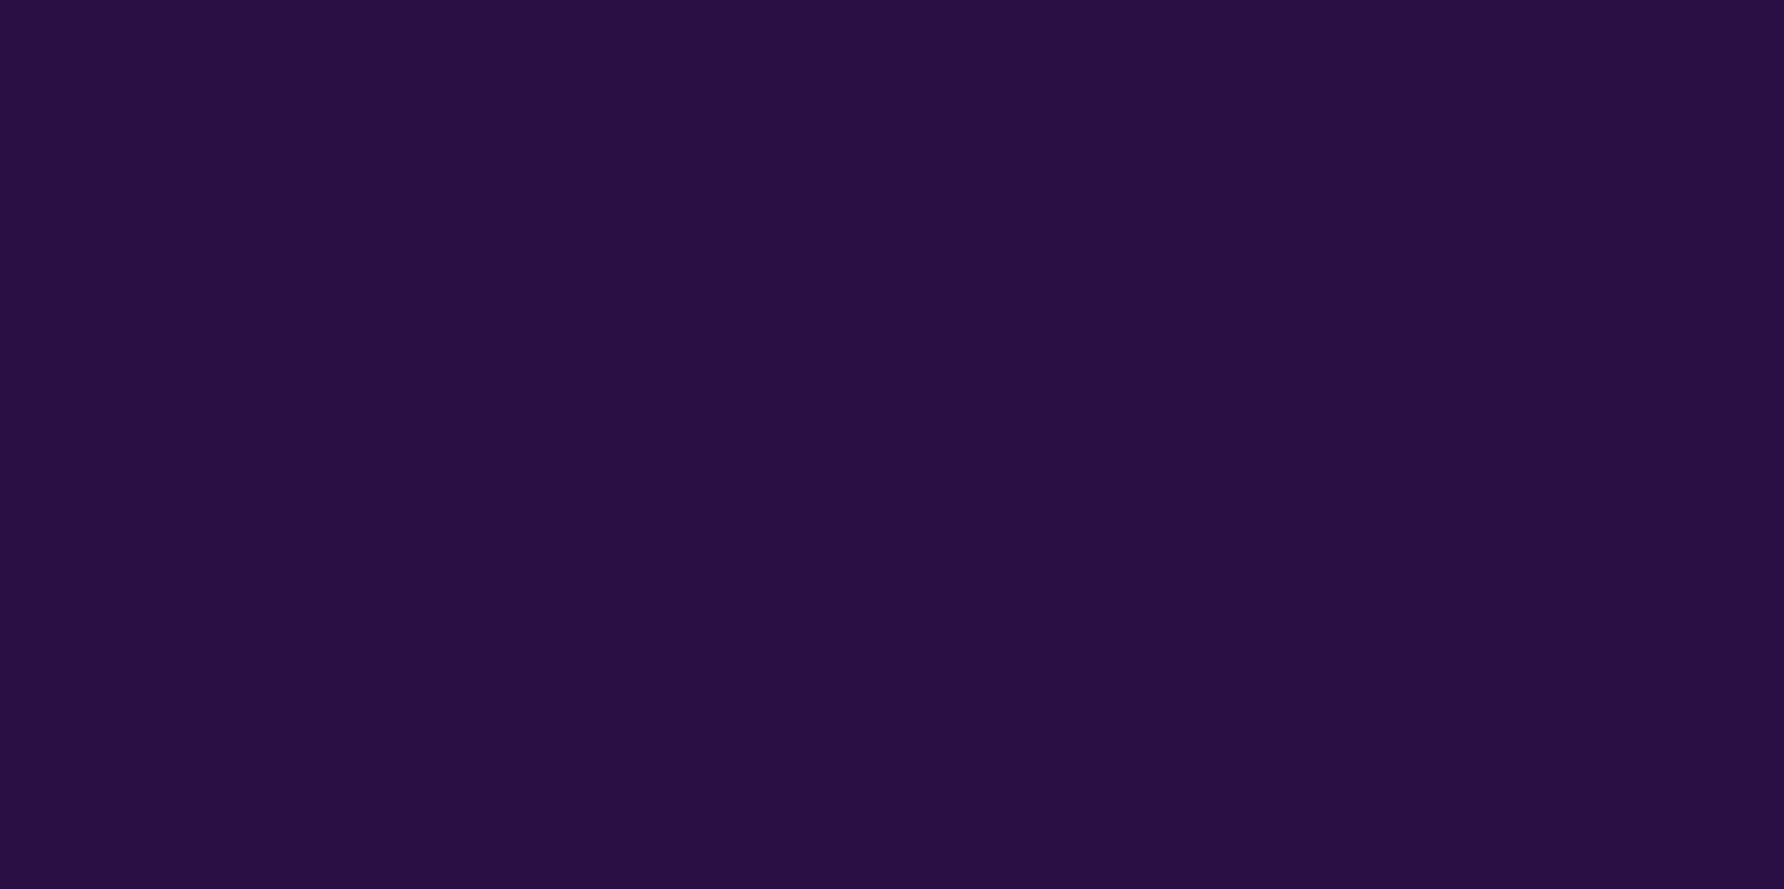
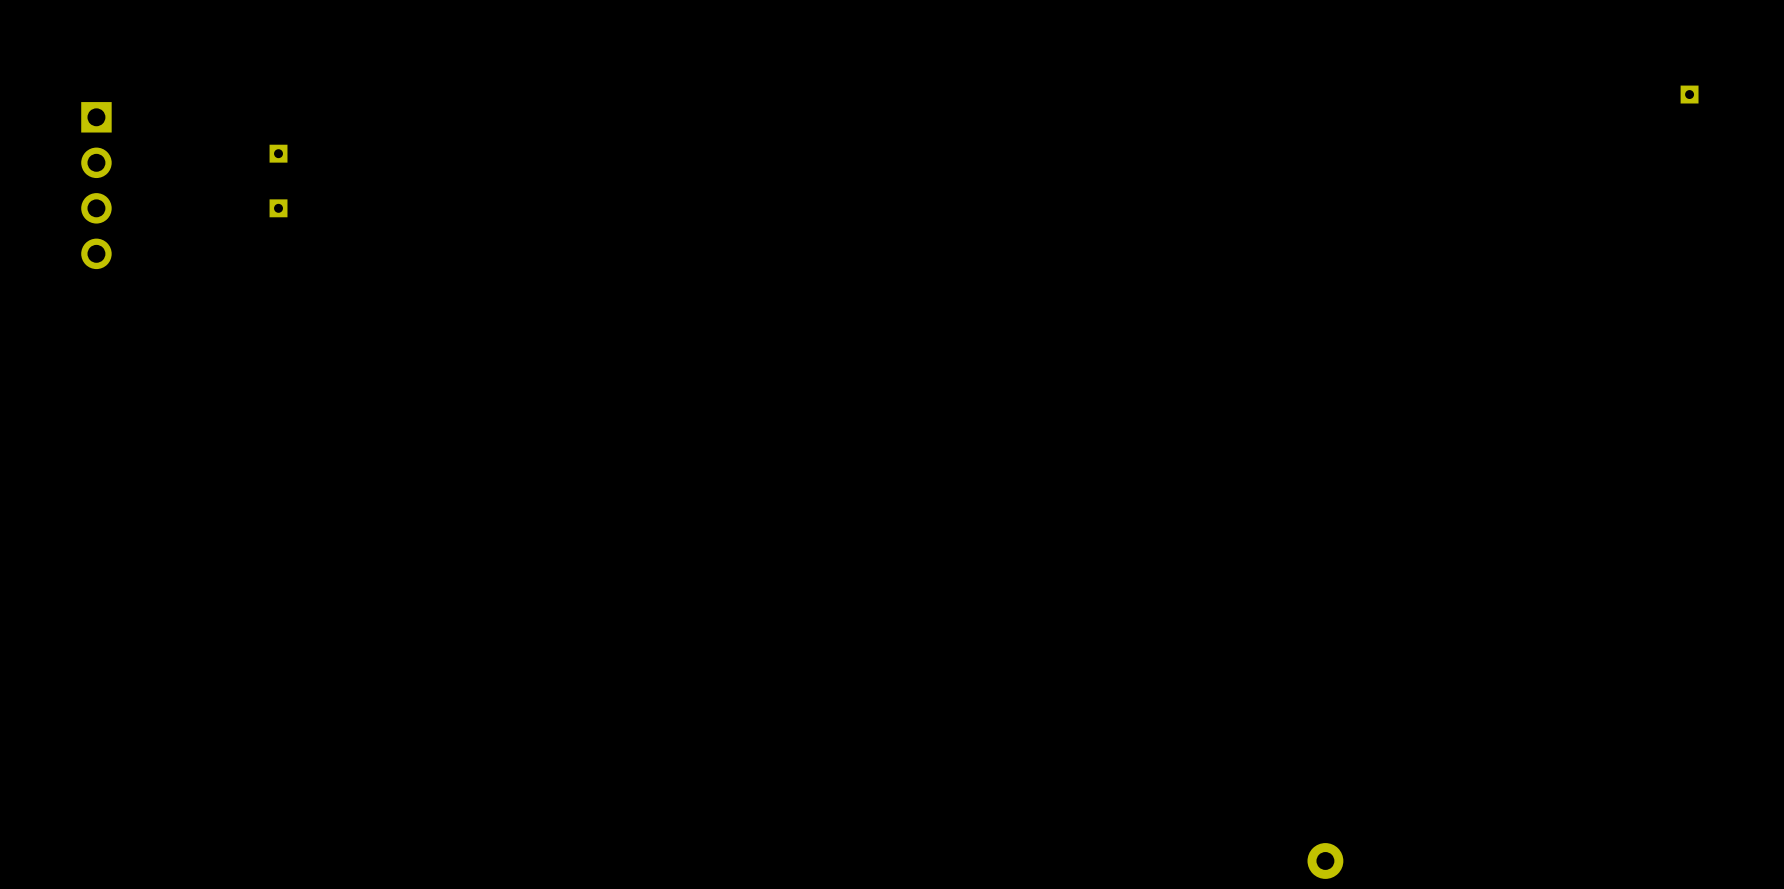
part: none -> (1689, 94)
part: none -> (278, 153)
part: none -> (96, 185)
part: none -> (278, 208)
part: none -> (1325, 860)

